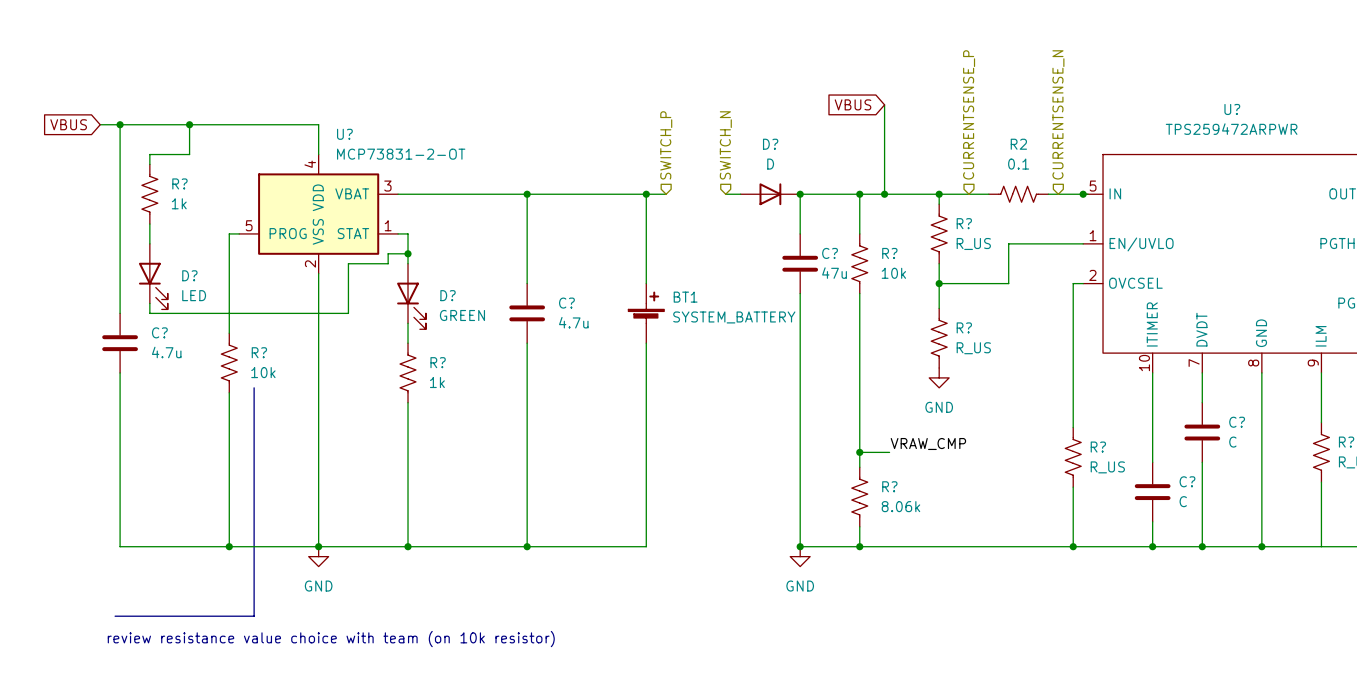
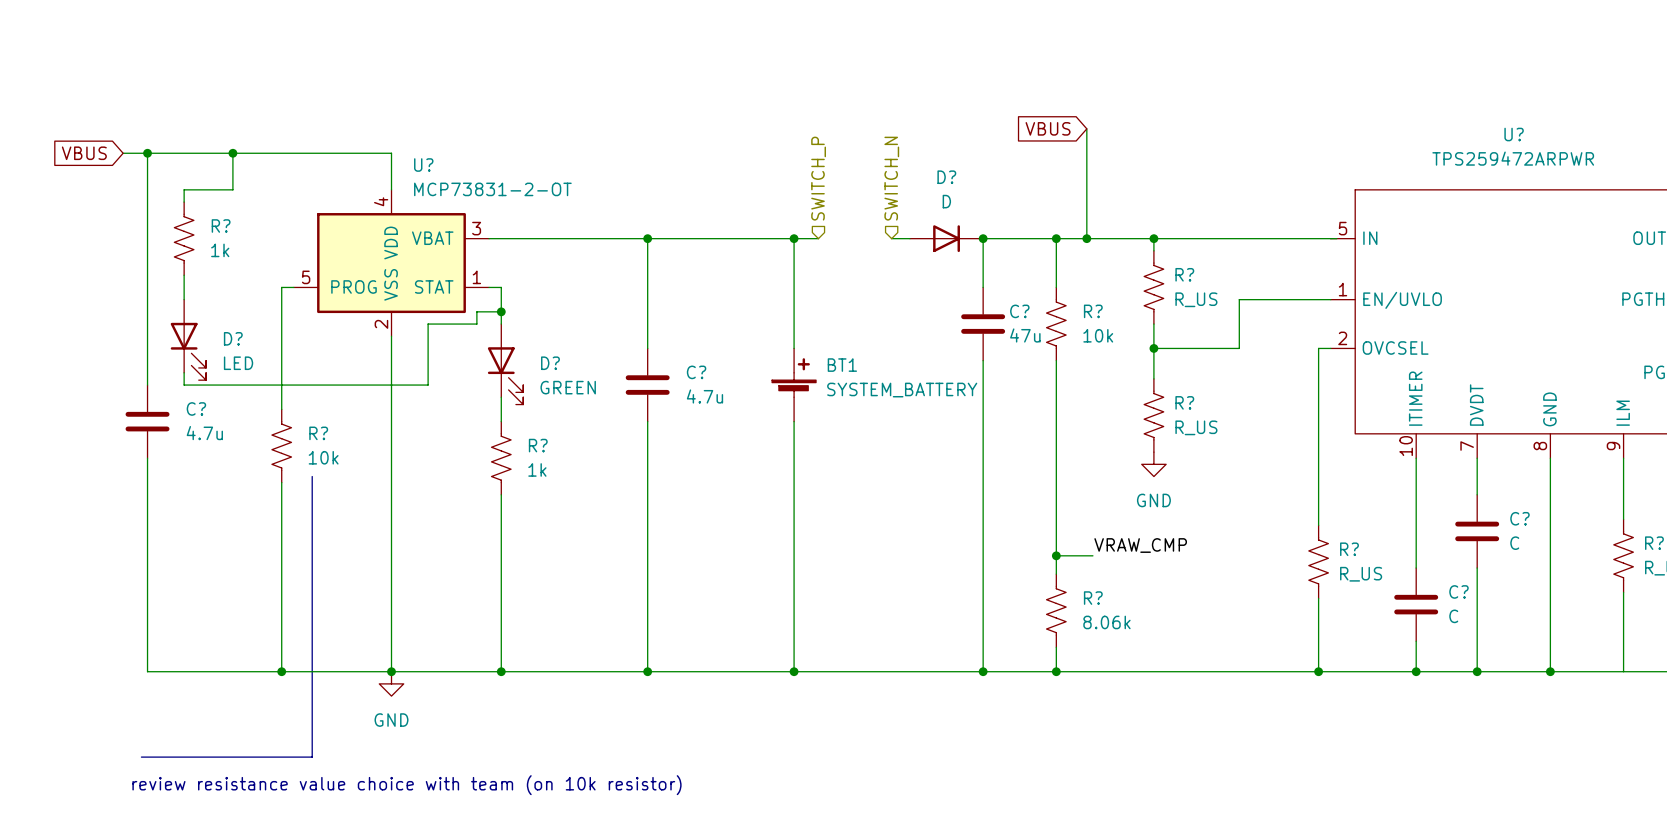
hierarchical label: CURRENTSENSE_P (969, 114) -> none
hierarchical label: CURRENTSENSE_N (1058, 114) -> none
R2: 0.1 (1018, 194) -> none
junction: (1083, 194) -> none
wire: none -> (794, 671) (983, 671)
junction: none -> (794, 671)
power symbol: GND (800, 556) -> none

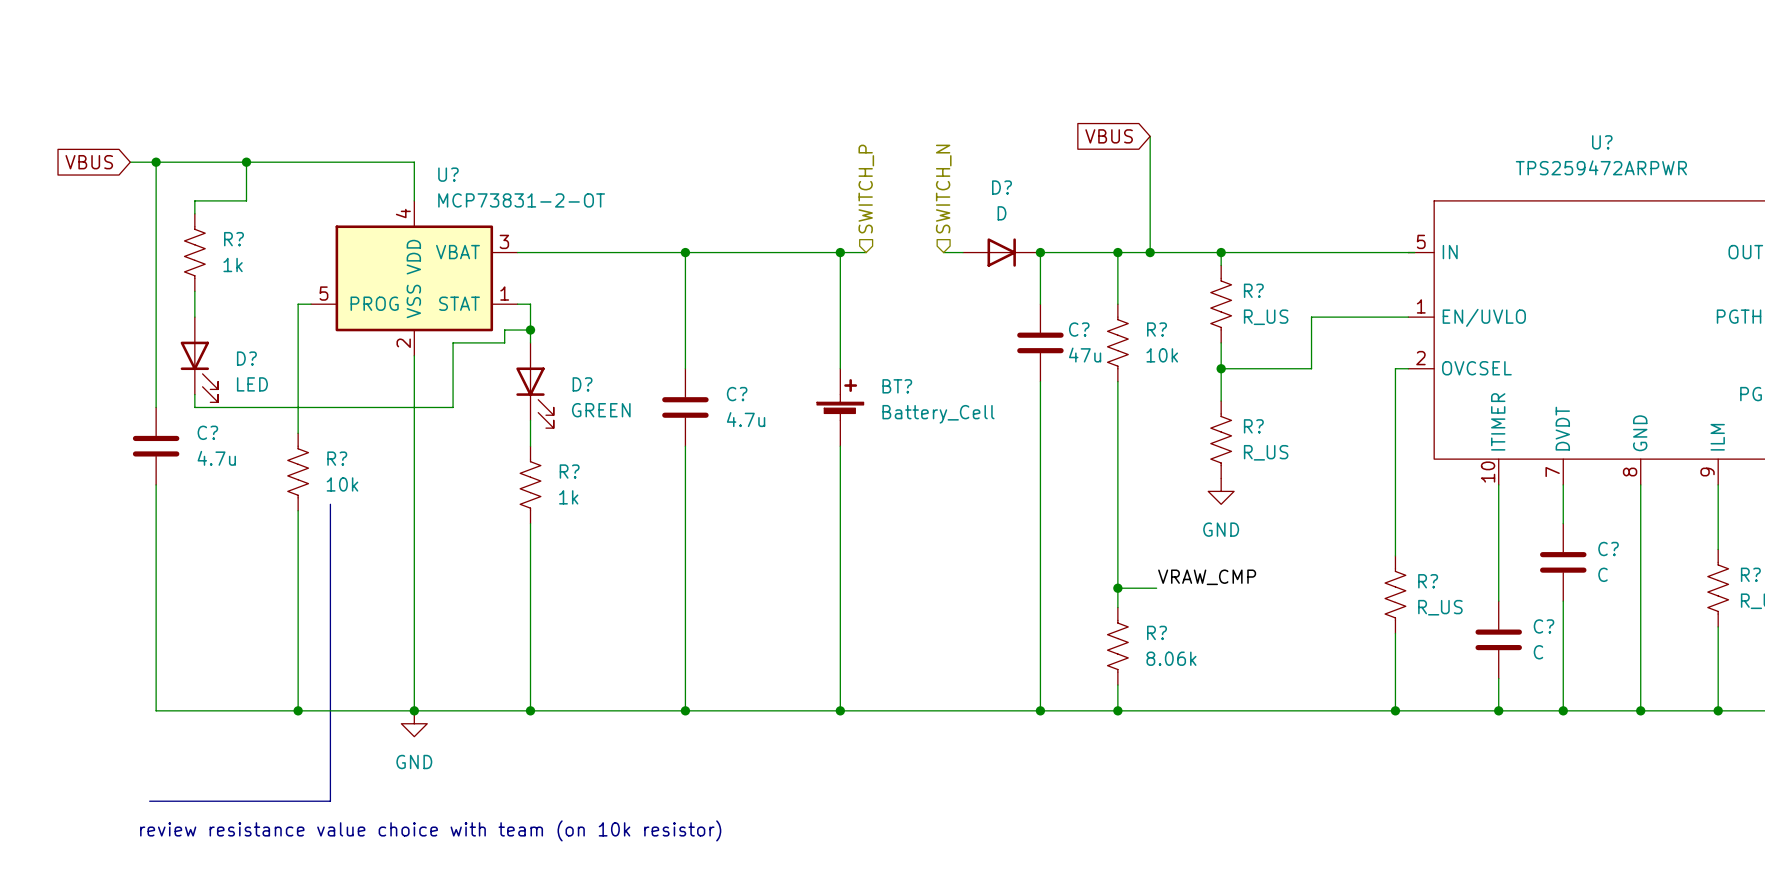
BT1 name: BT1 (842, 365) -> BT? (897, 386)
BT1 value: SYSTEM_BATTERY (902, 390) -> Battery_Cell (938, 414)
junction: none -> (1718, 710)

